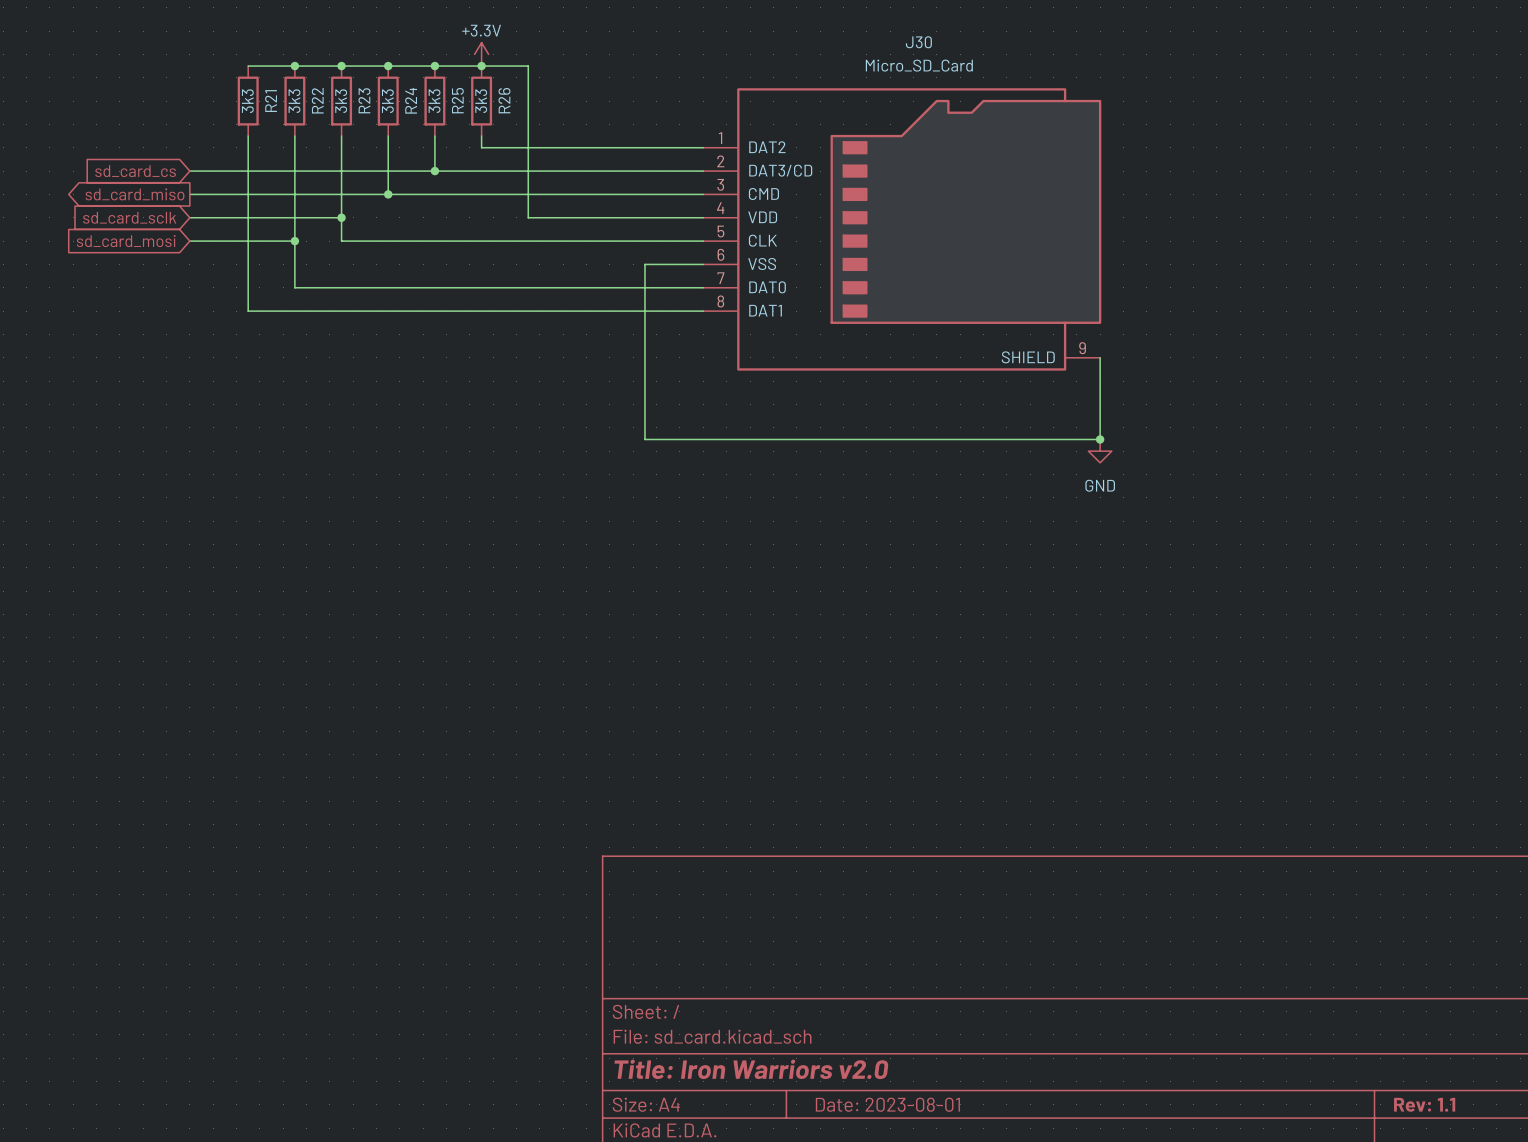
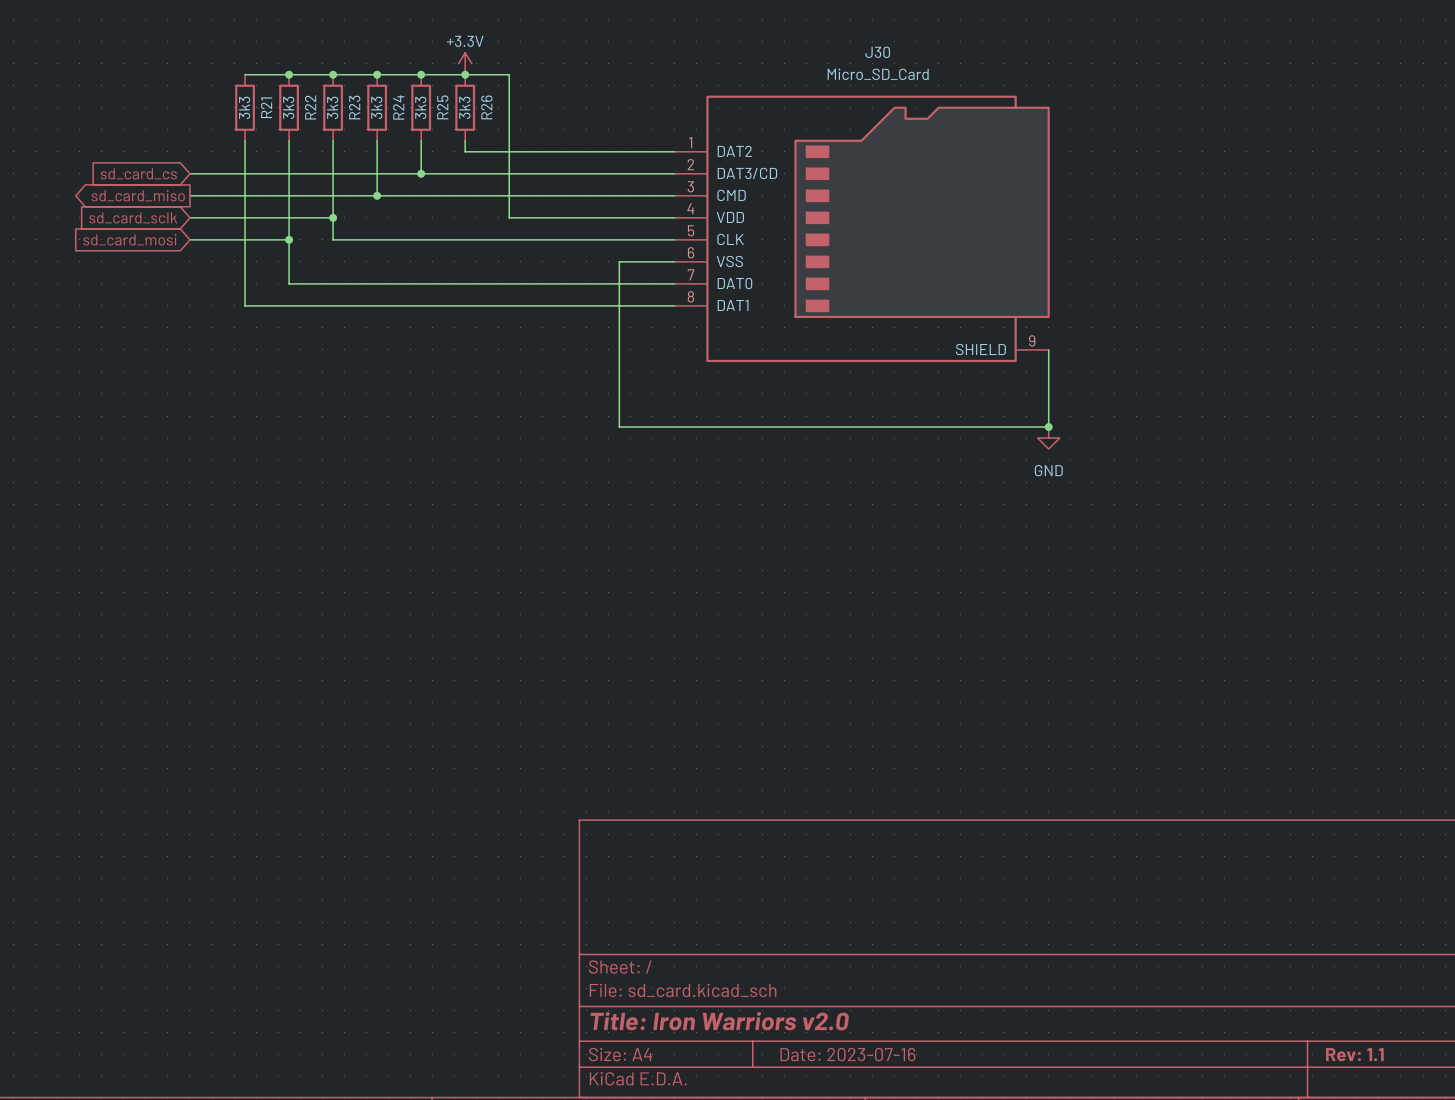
title block: Date: 2023-08-01 (887, 1104) -> Date: 2023-07-16 (847, 1054)

